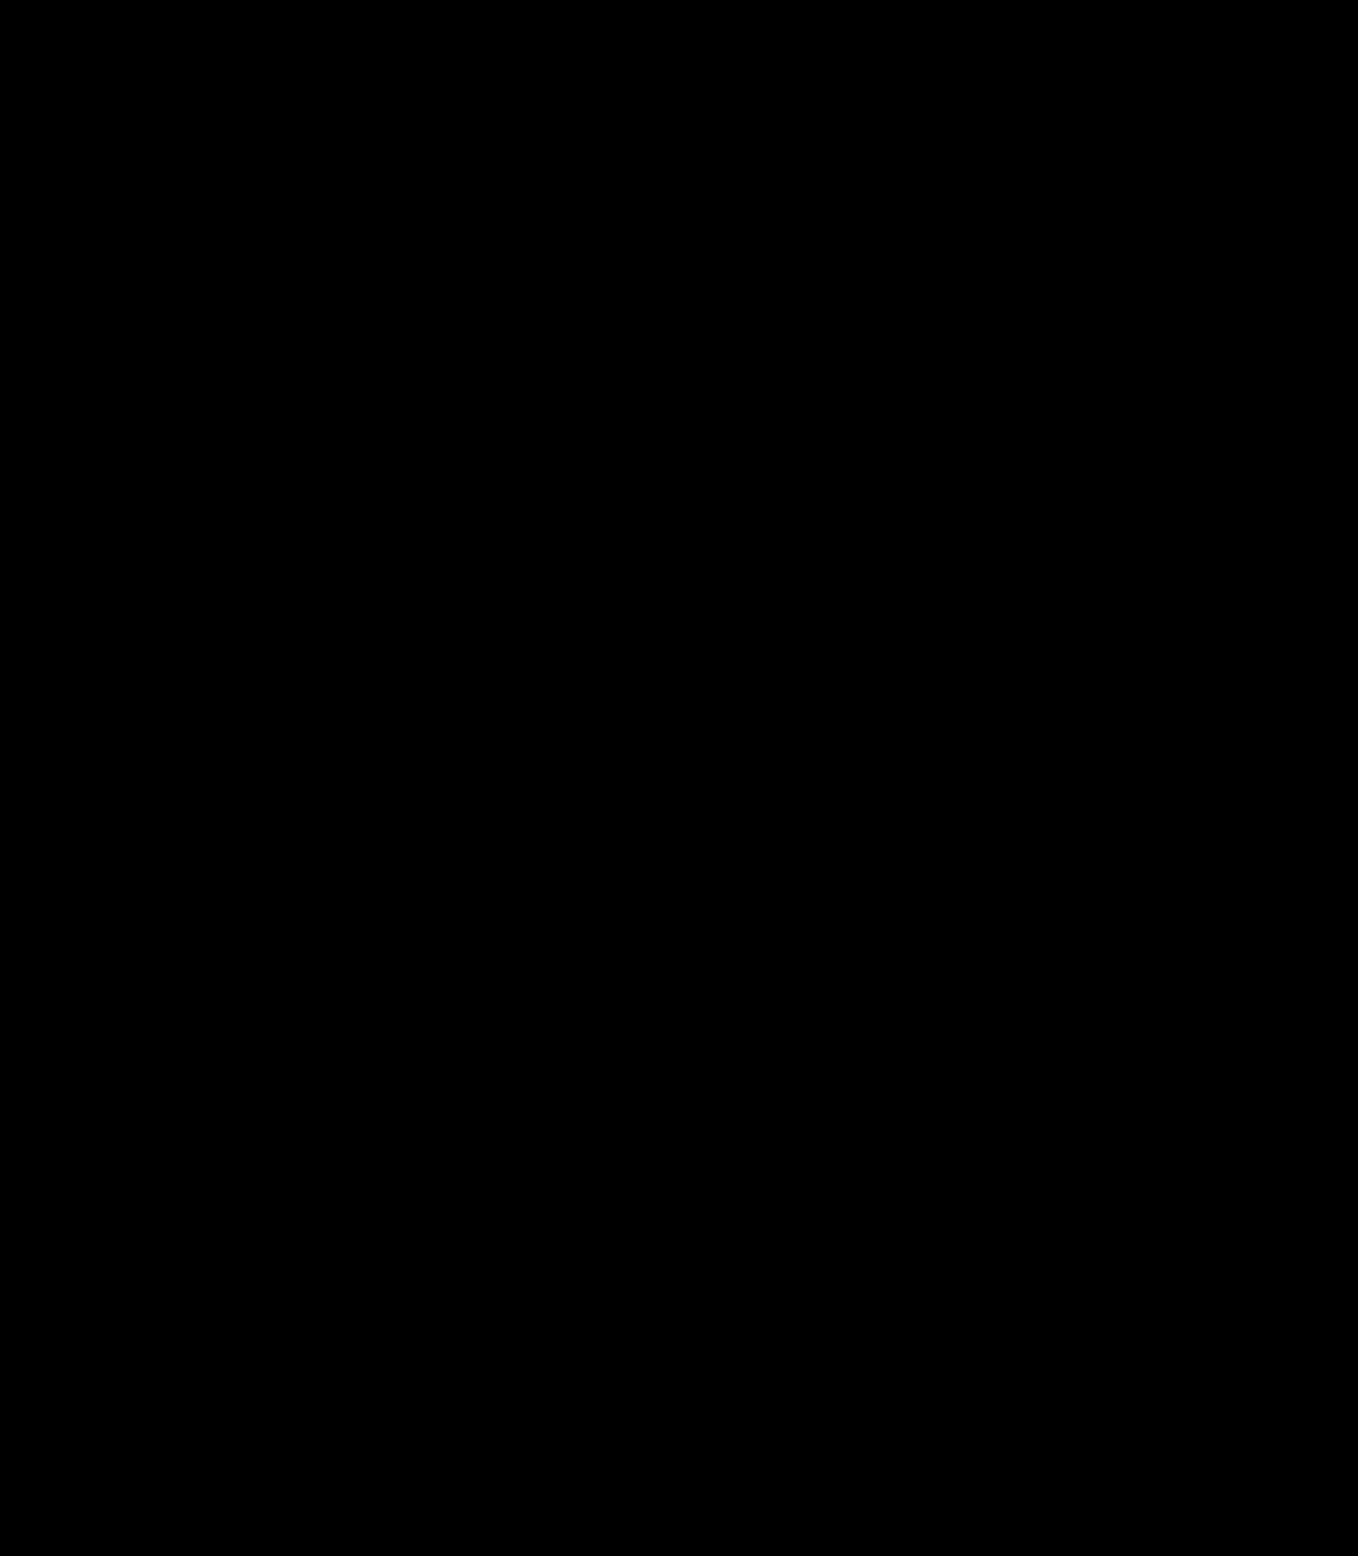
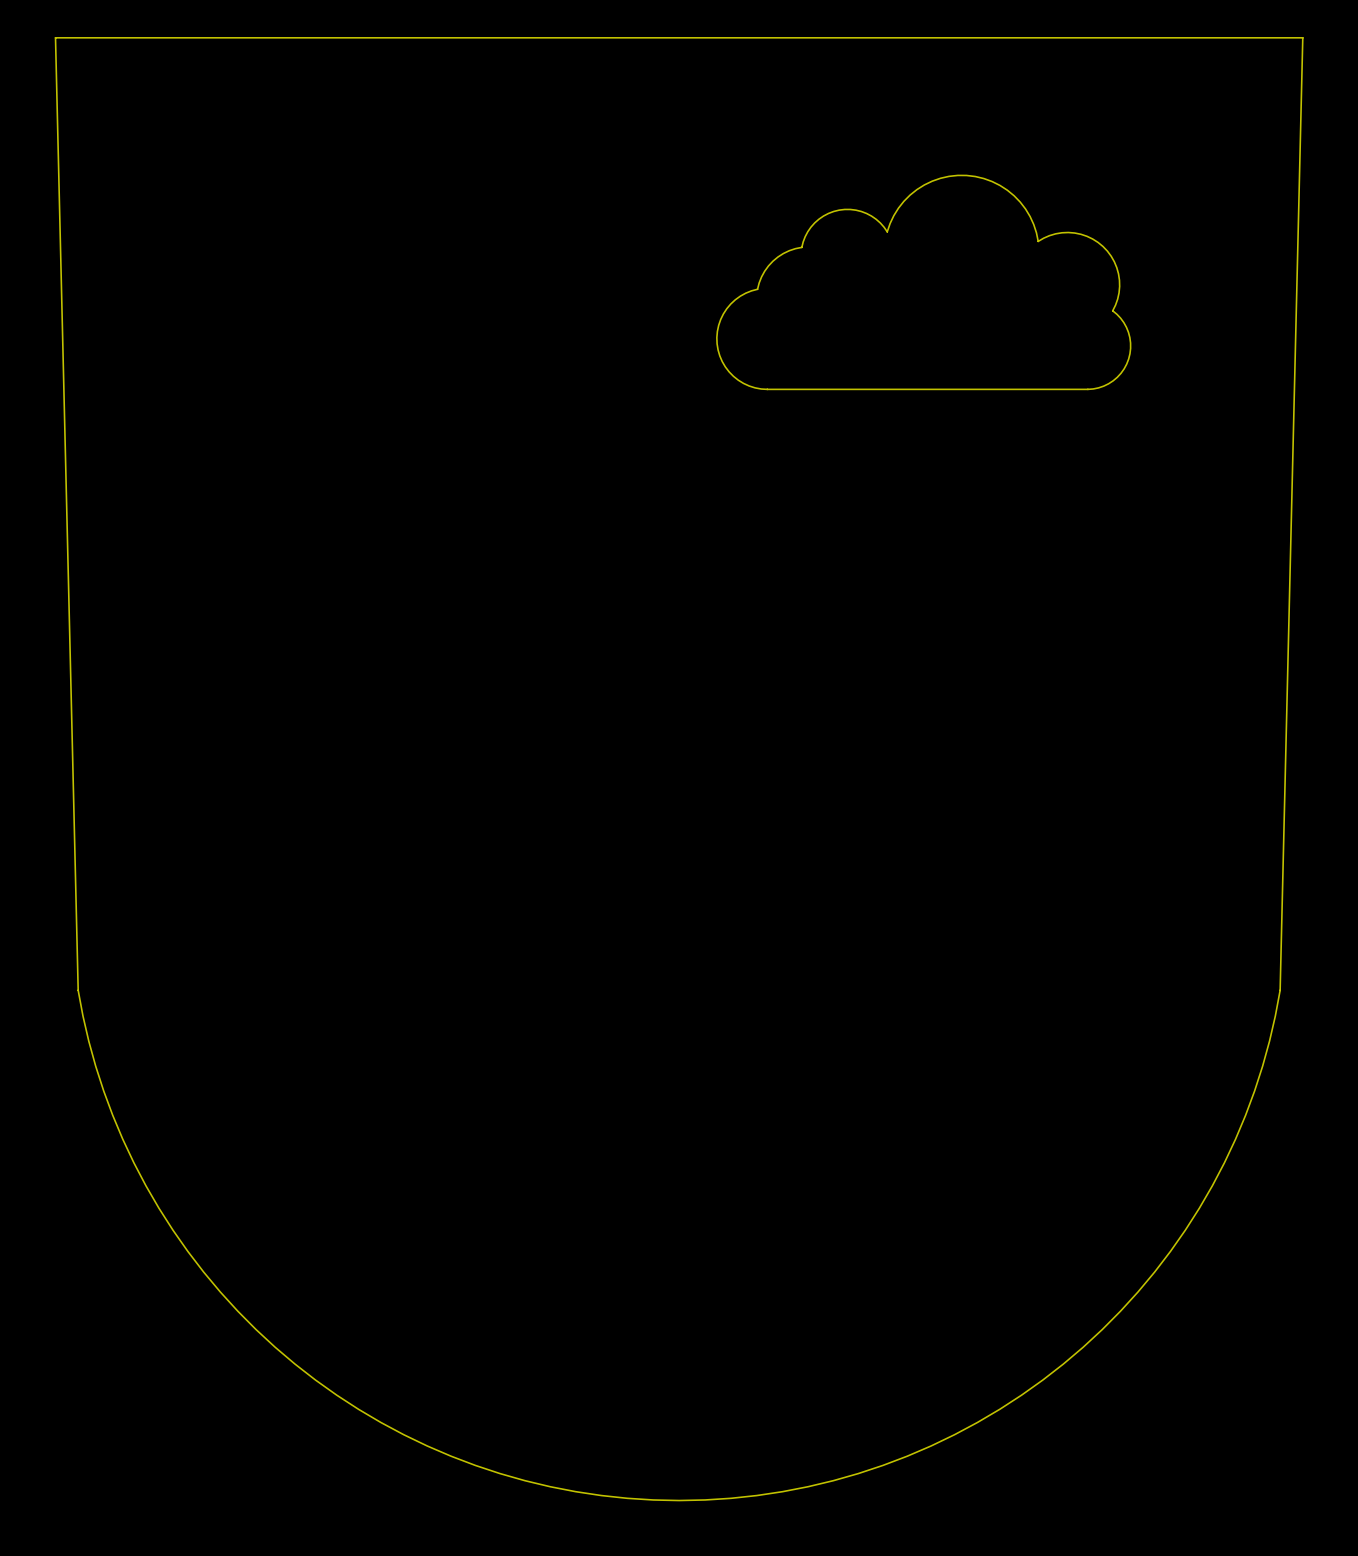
board edge: none -> (55, 37) (1302, 37) (1280, 990) (1275, 1015) (1254, 1090) (1235, 1139) (1212, 1185) (1185, 1230) (1154, 1272) (1120, 1311) (1083, 1347) (1042, 1380) (999, 1409) (931, 1445) (883, 1465) (833, 1480) (782, 1491) (731, 1498) (653, 1499) (601, 1495) (550, 1486) (499, 1473) (427, 1445) (380, 1422) (315, 1380) (275, 1347) (220, 1291) (187, 1251) (145, 1185) (112, 1115) (88, 1041) (78, 990) (55, 37)
board edge: none -> (767, 389) (1087, 389) (1103, 386) (1117, 377) (1124, 368) (1130, 348) (1126, 327) (1112, 310) (1117, 299) (1119, 286) (1116, 267) (1111, 256) (1103, 246) (1092, 239) (1080, 234) (1061, 232) (1049, 235) (1038, 241) (1030, 216) (1014, 195) (999, 185) (975, 176) (949, 176) (924, 184) (903, 201) (893, 215) (887, 231) (876, 219) (861, 211) (844, 209) (833, 211) (823, 216) (810, 227) (801, 247) (783, 253) (772, 261) (764, 271) (757, 289) (745, 293) (735, 299) (726, 308) (720, 319) (717, 331) (717, 343) (719, 355) (725, 366) (733, 376) (743, 383) (755, 387) (761, 389) (767, 389)

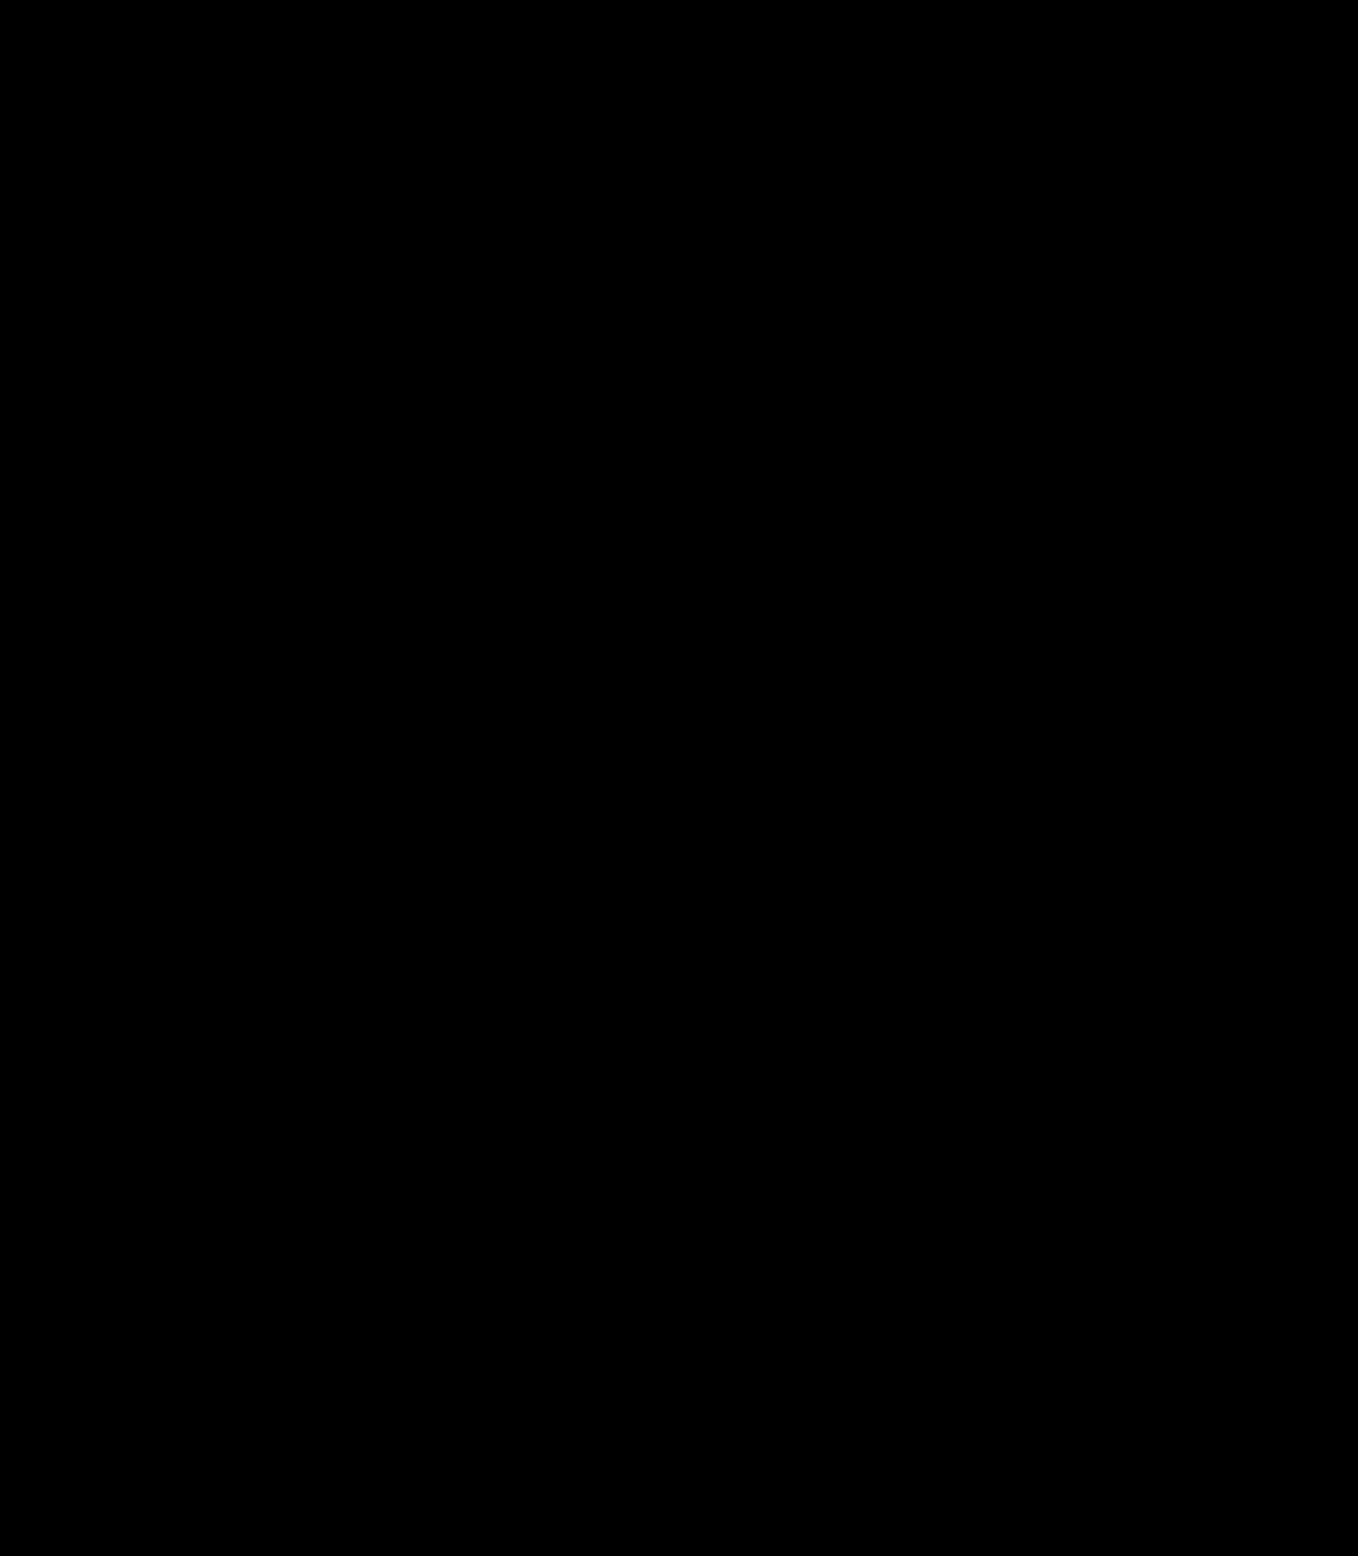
board edge: (55, 37) (1302, 37) (1280, 990) (1275, 1015) (1254, 1090) (1235, 1139) (1212, 1185) (1185, 1230) (1154, 1272) (1120, 1311) (1083, 1347) (1042, 1380) (999, 1409) (931, 1445) (883, 1465) (833, 1480) (782, 1491) (731, 1498) (653, 1499) (601, 1495) (550, 1486) (499, 1473) (427, 1445) (380, 1422) (315, 1380) (275, 1347) (220, 1291) (187, 1251) (145, 1185) (112, 1115) (88, 1041) (78, 990) (55, 37) -> none
board edge: (767, 389) (1087, 389) (1103, 386) (1117, 377) (1124, 368) (1130, 348) (1126, 327) (1112, 310) (1117, 299) (1119, 286) (1116, 267) (1111, 256) (1103, 246) (1092, 239) (1080, 234) (1061, 232) (1049, 235) (1038, 241) (1030, 216) (1014, 195) (999, 185) (975, 176) (949, 176) (924, 184) (903, 201) (893, 215) (887, 231) (876, 219) (861, 211) (844, 209) (833, 211) (823, 216) (810, 227) (801, 247) (783, 253) (772, 261) (764, 271) (757, 289) (745, 293) (735, 299) (726, 308) (720, 319) (717, 331) (717, 343) (719, 355) (725, 366) (733, 376) (743, 383) (755, 387) (761, 389) (767, 389) -> none

